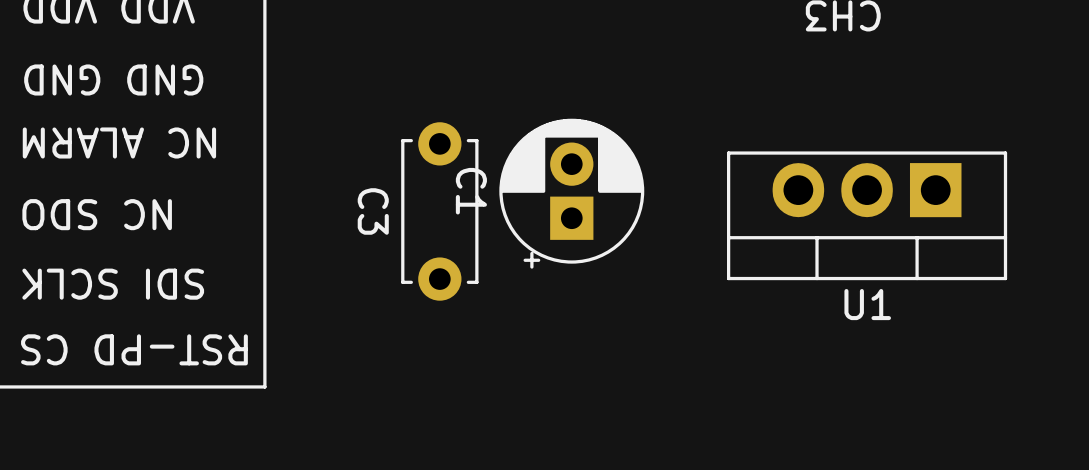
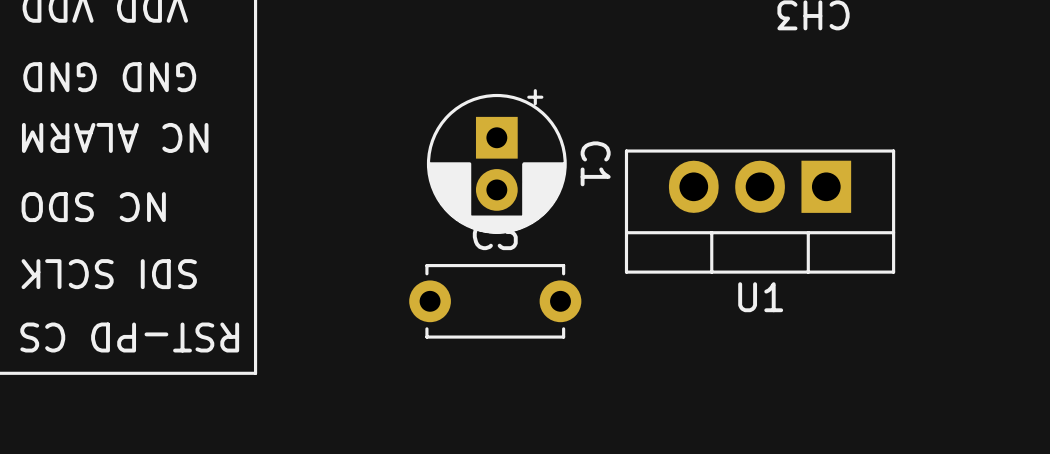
C1 rotation: 0° (571, 193) -> 180° (496, 161)
C3 rotation: 0° (439, 211) -> 90° clockwise (495, 301)
C3 position: (439, 211) -> (495, 301)
U1 position: (867, 215) -> (760, 211)

